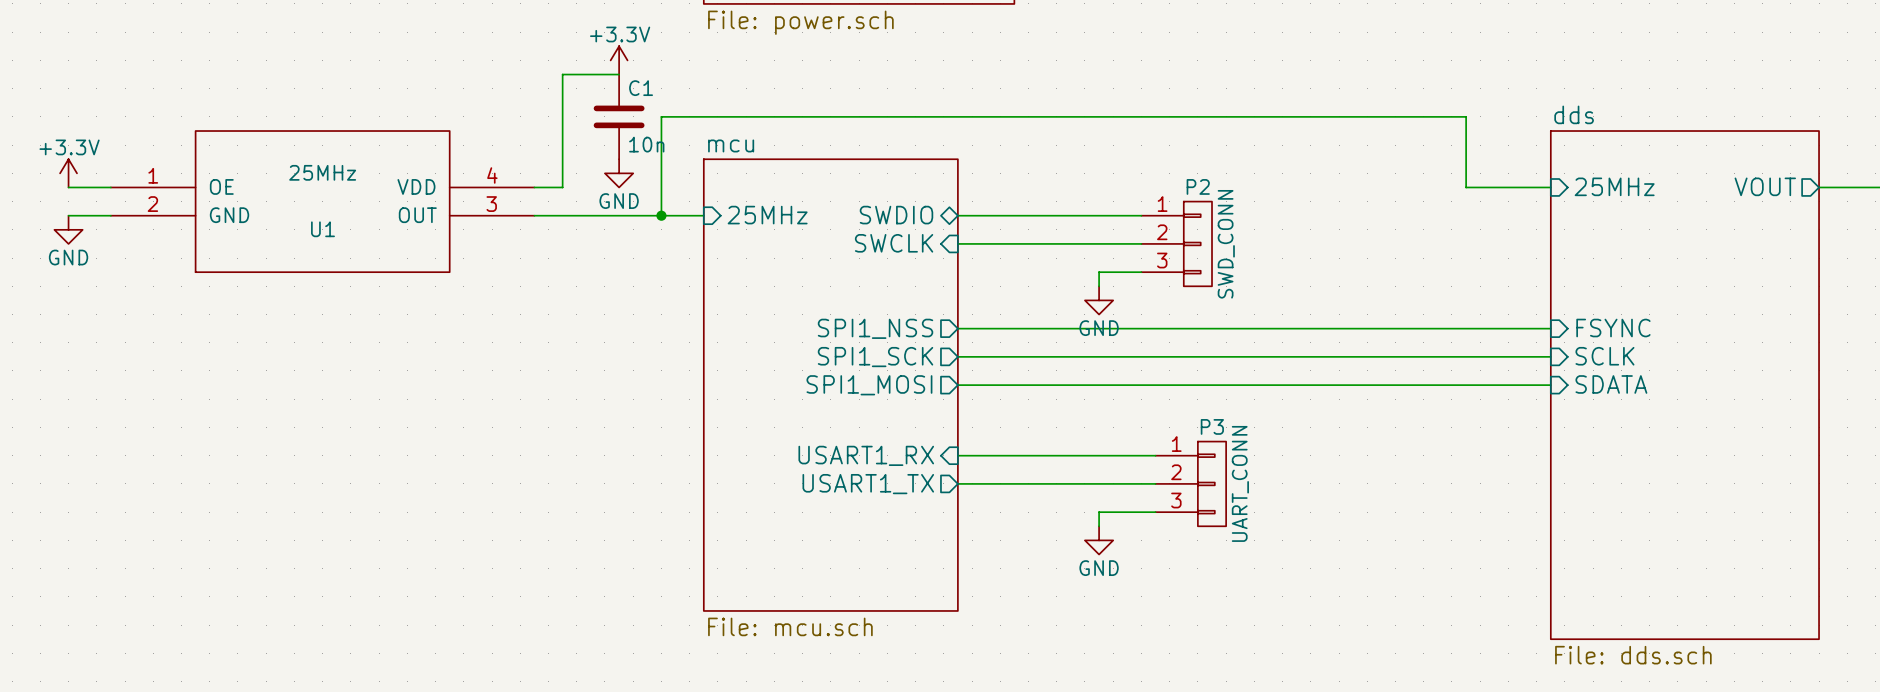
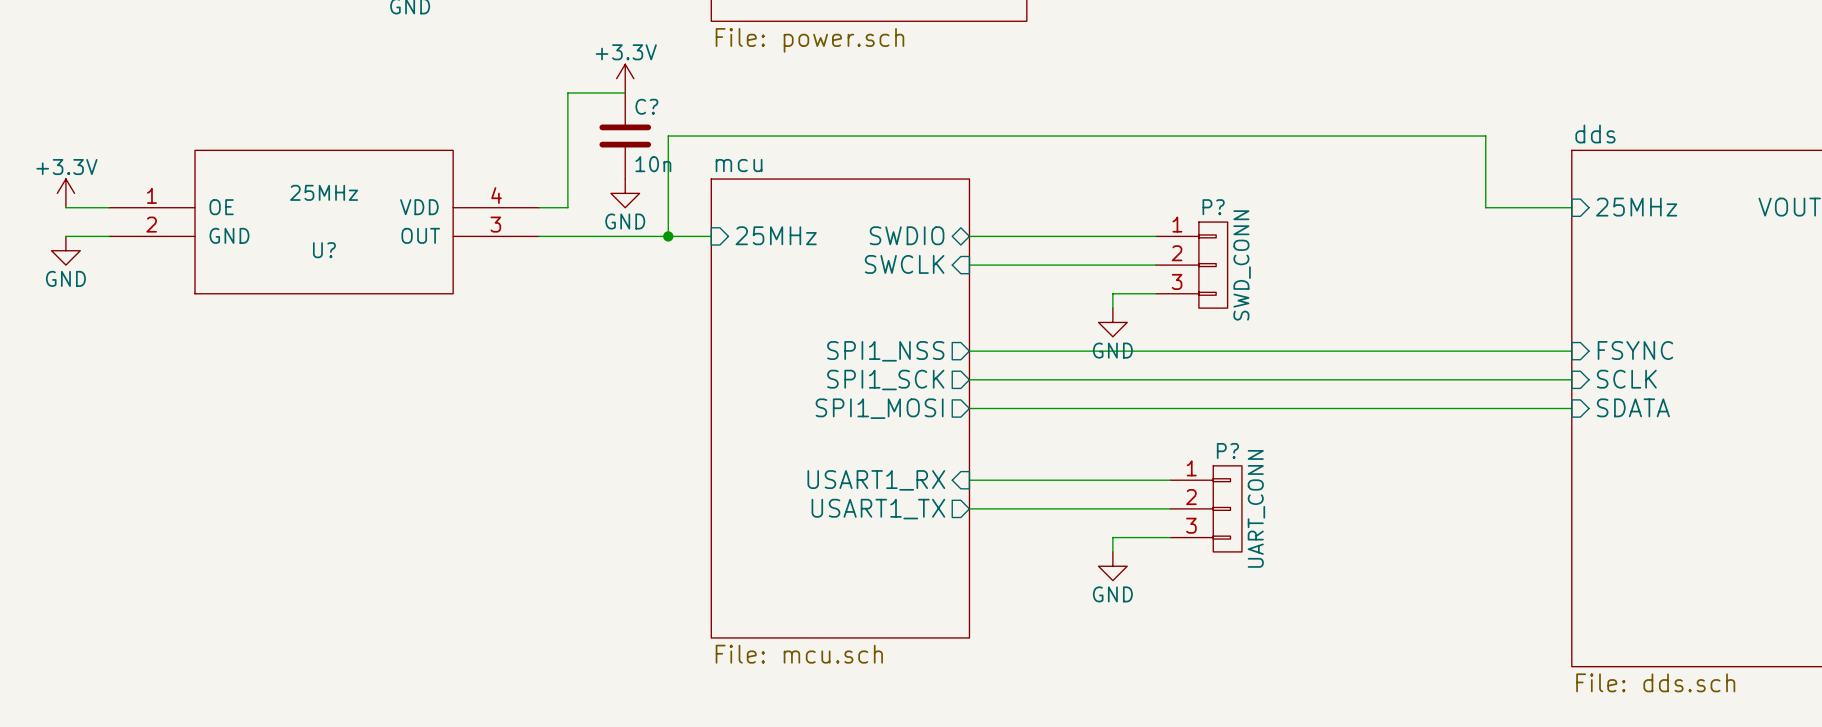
C1 name: C1 (641, 88) -> C? (646, 106)
P2 name: P2 (1198, 186) -> P? (1213, 207)
U1 name: U1 (322, 229) -> U? (324, 250)
P3 name: P3 (1212, 426) -> P? (1227, 450)

